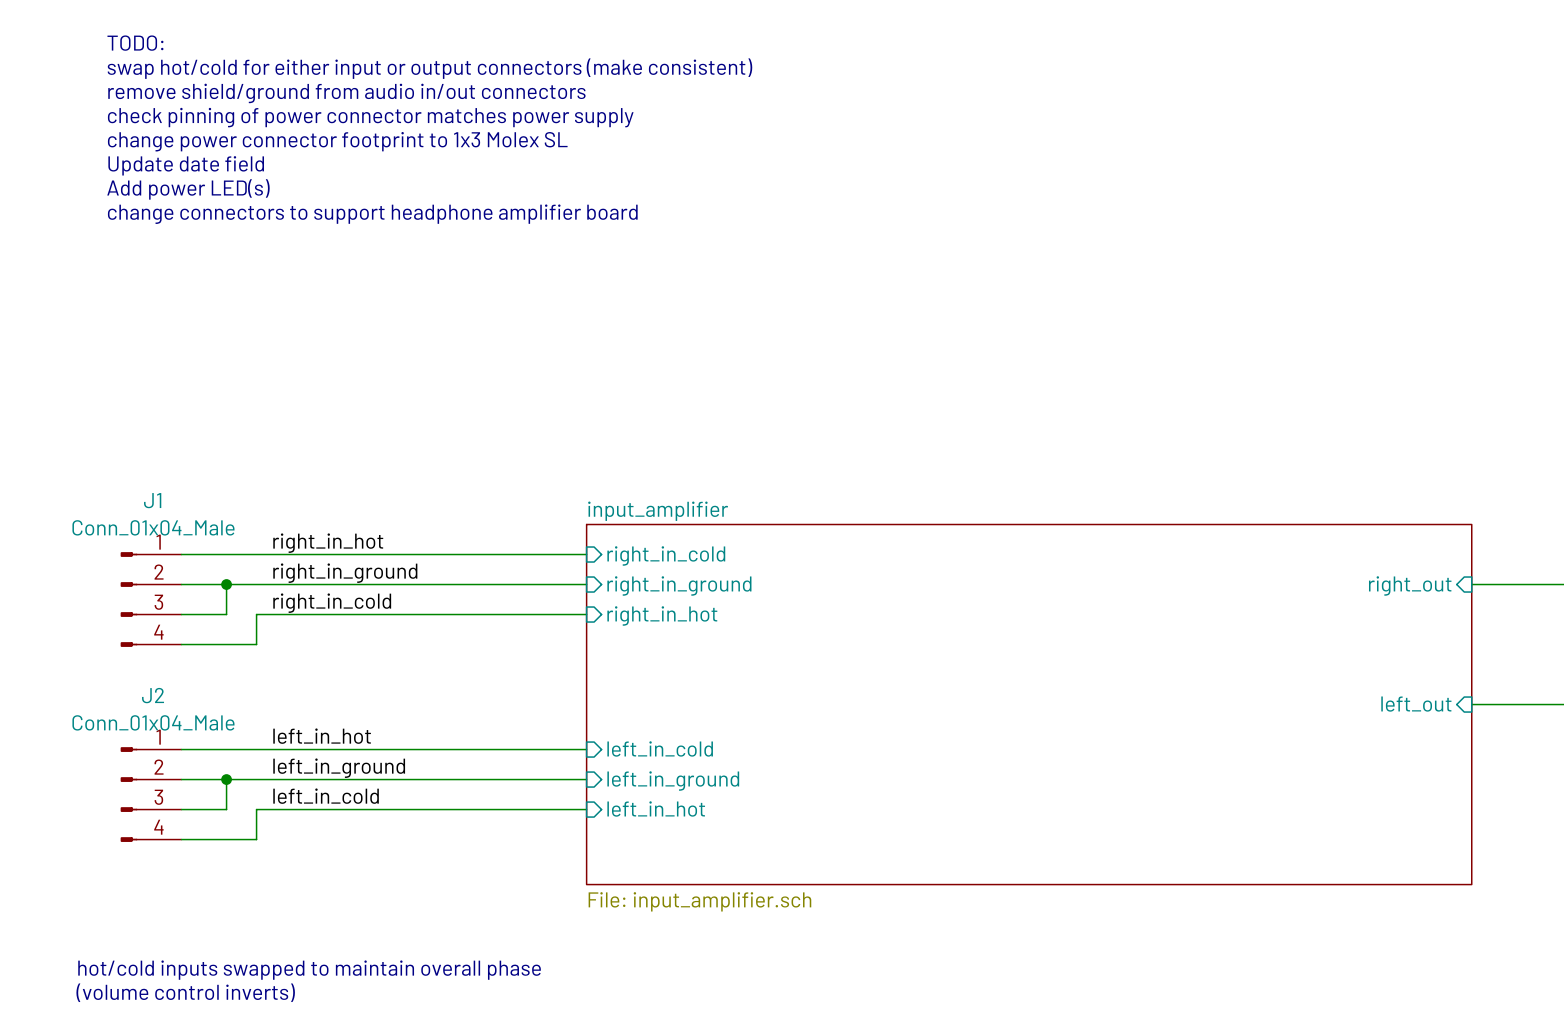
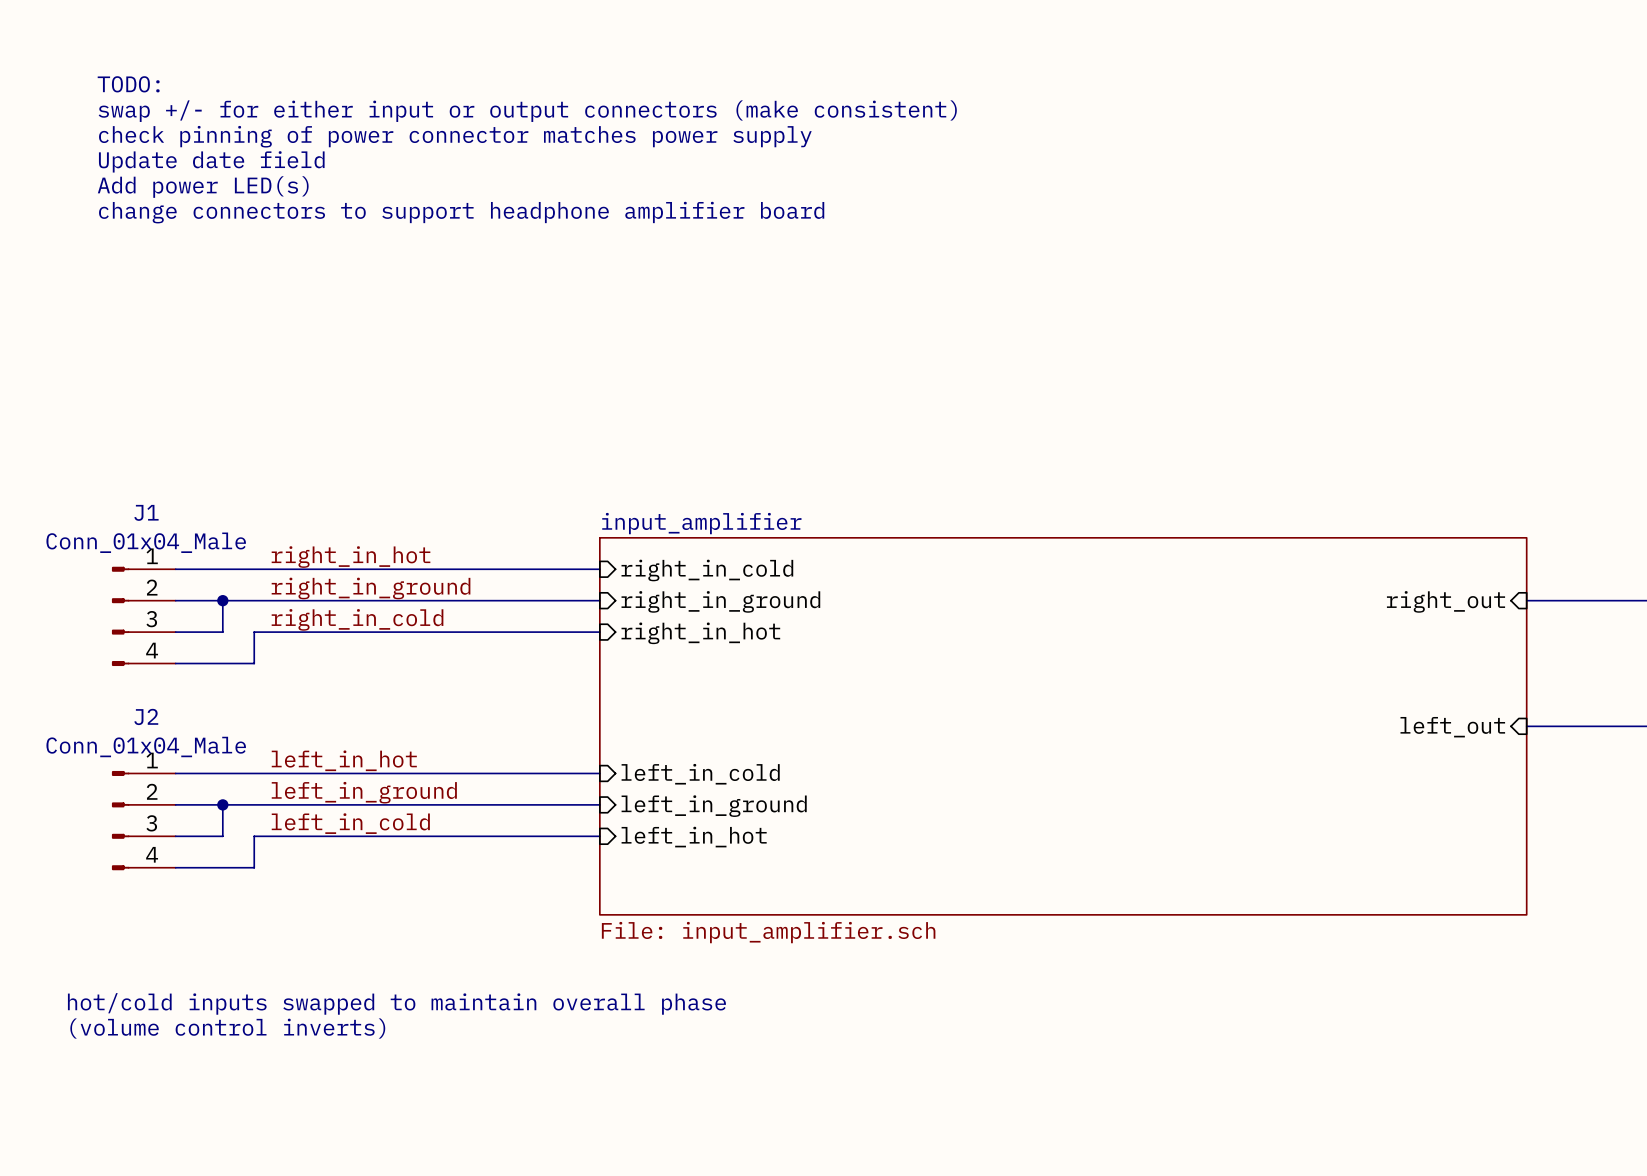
text: TODO: (135, 43) -> none
text: swap hot/cold for either input or output connectors (make consistent) (429, 68) -> none
text: remove shield/ground from audio in/out connectors (346, 93) -> TODO: (128, 84)
text: check pinning of power connector matches power supply (370, 117) -> swap +/- for either input or output connectors (make consistent) (527, 111)
text: change power connector footprint to 1x3 Molex SL (337, 141) -> check pinning of power connector matches power supply (455, 136)

